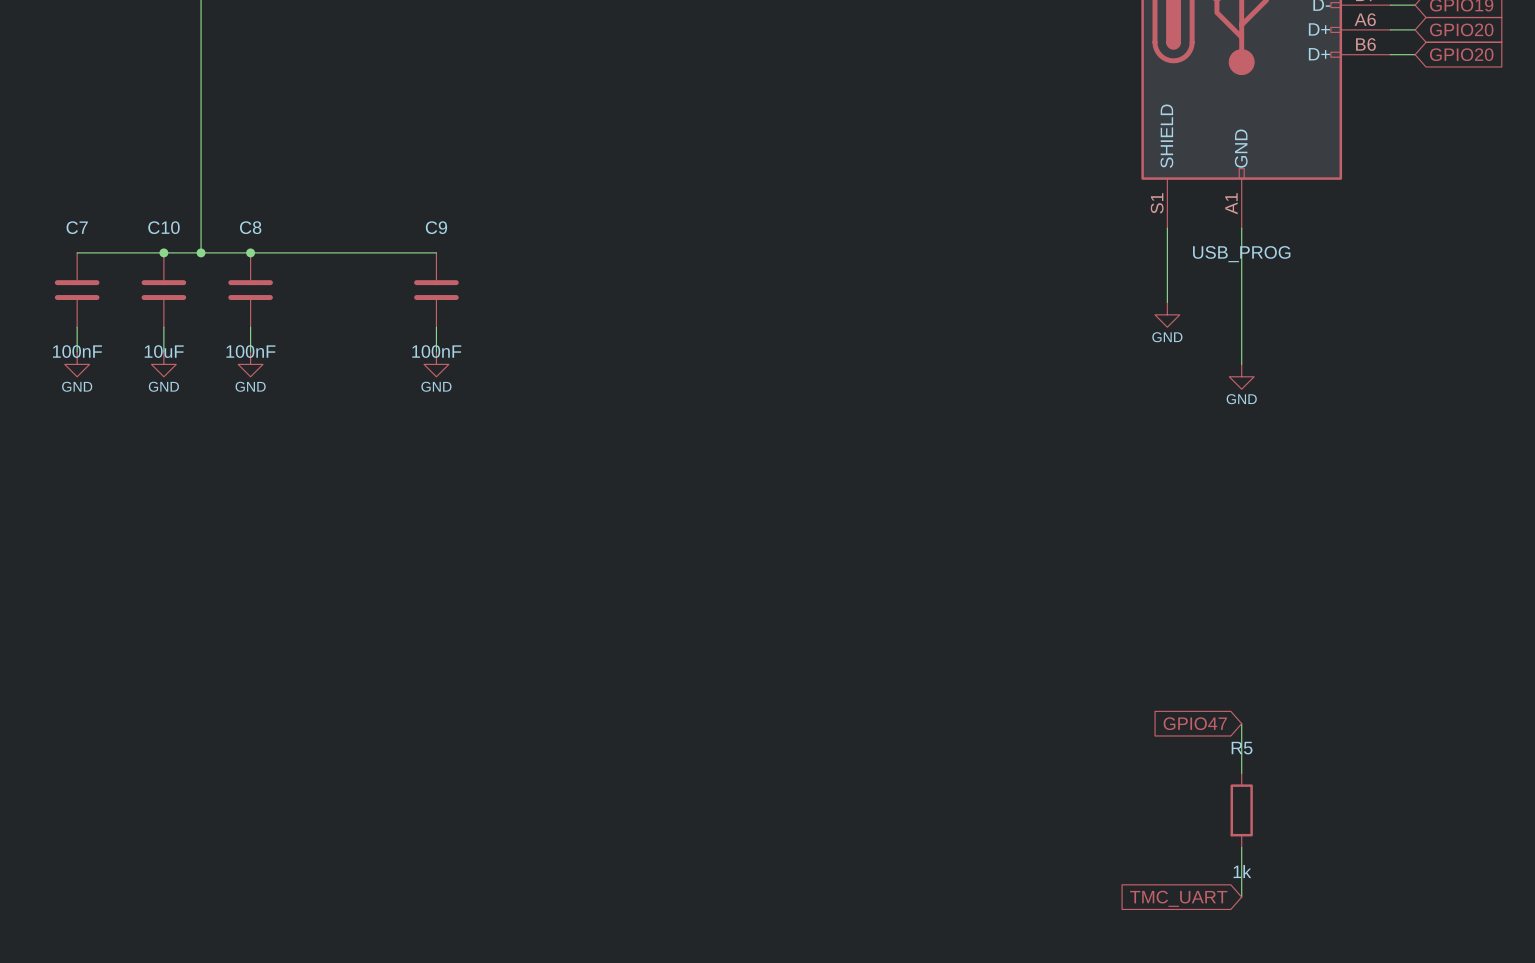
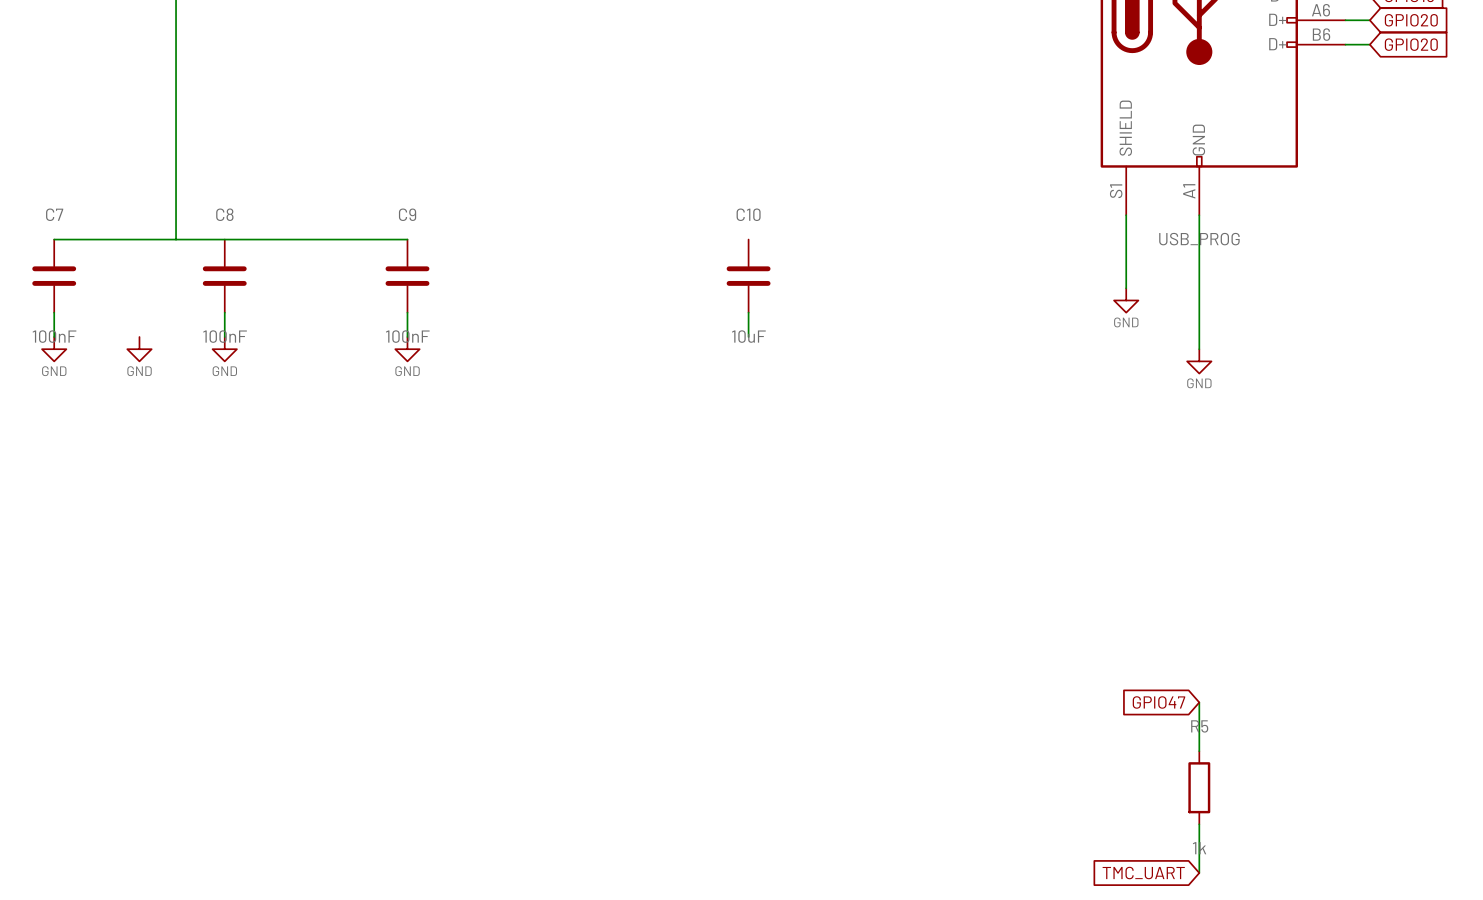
junction: (163, 252) -> none
junction: (201, 252) -> none
junction: (250, 252) -> none
C10 position: (163, 290) -> (748, 276)
wire: (163, 327) (163, 352) -> none
wire: none -> (748, 312) (748, 337)

